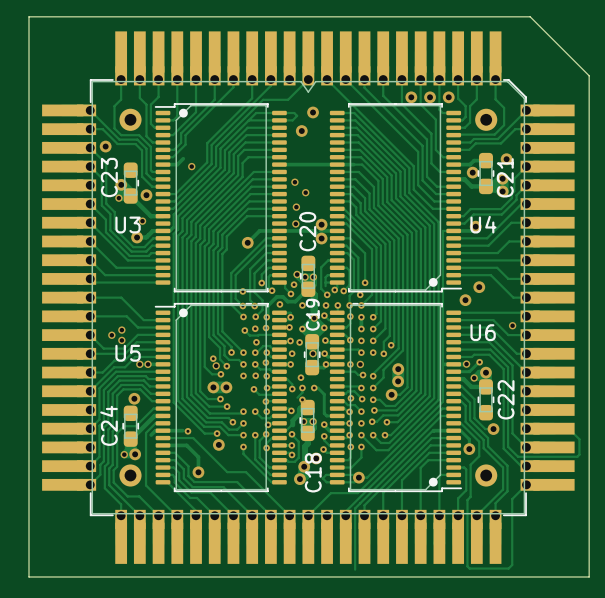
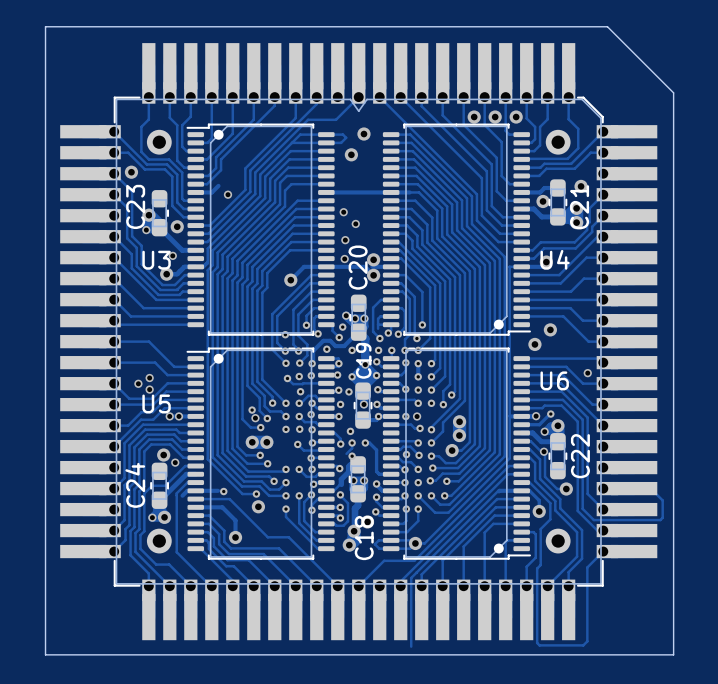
via: none -> (544, 451)
via: none -> (175, 462)

